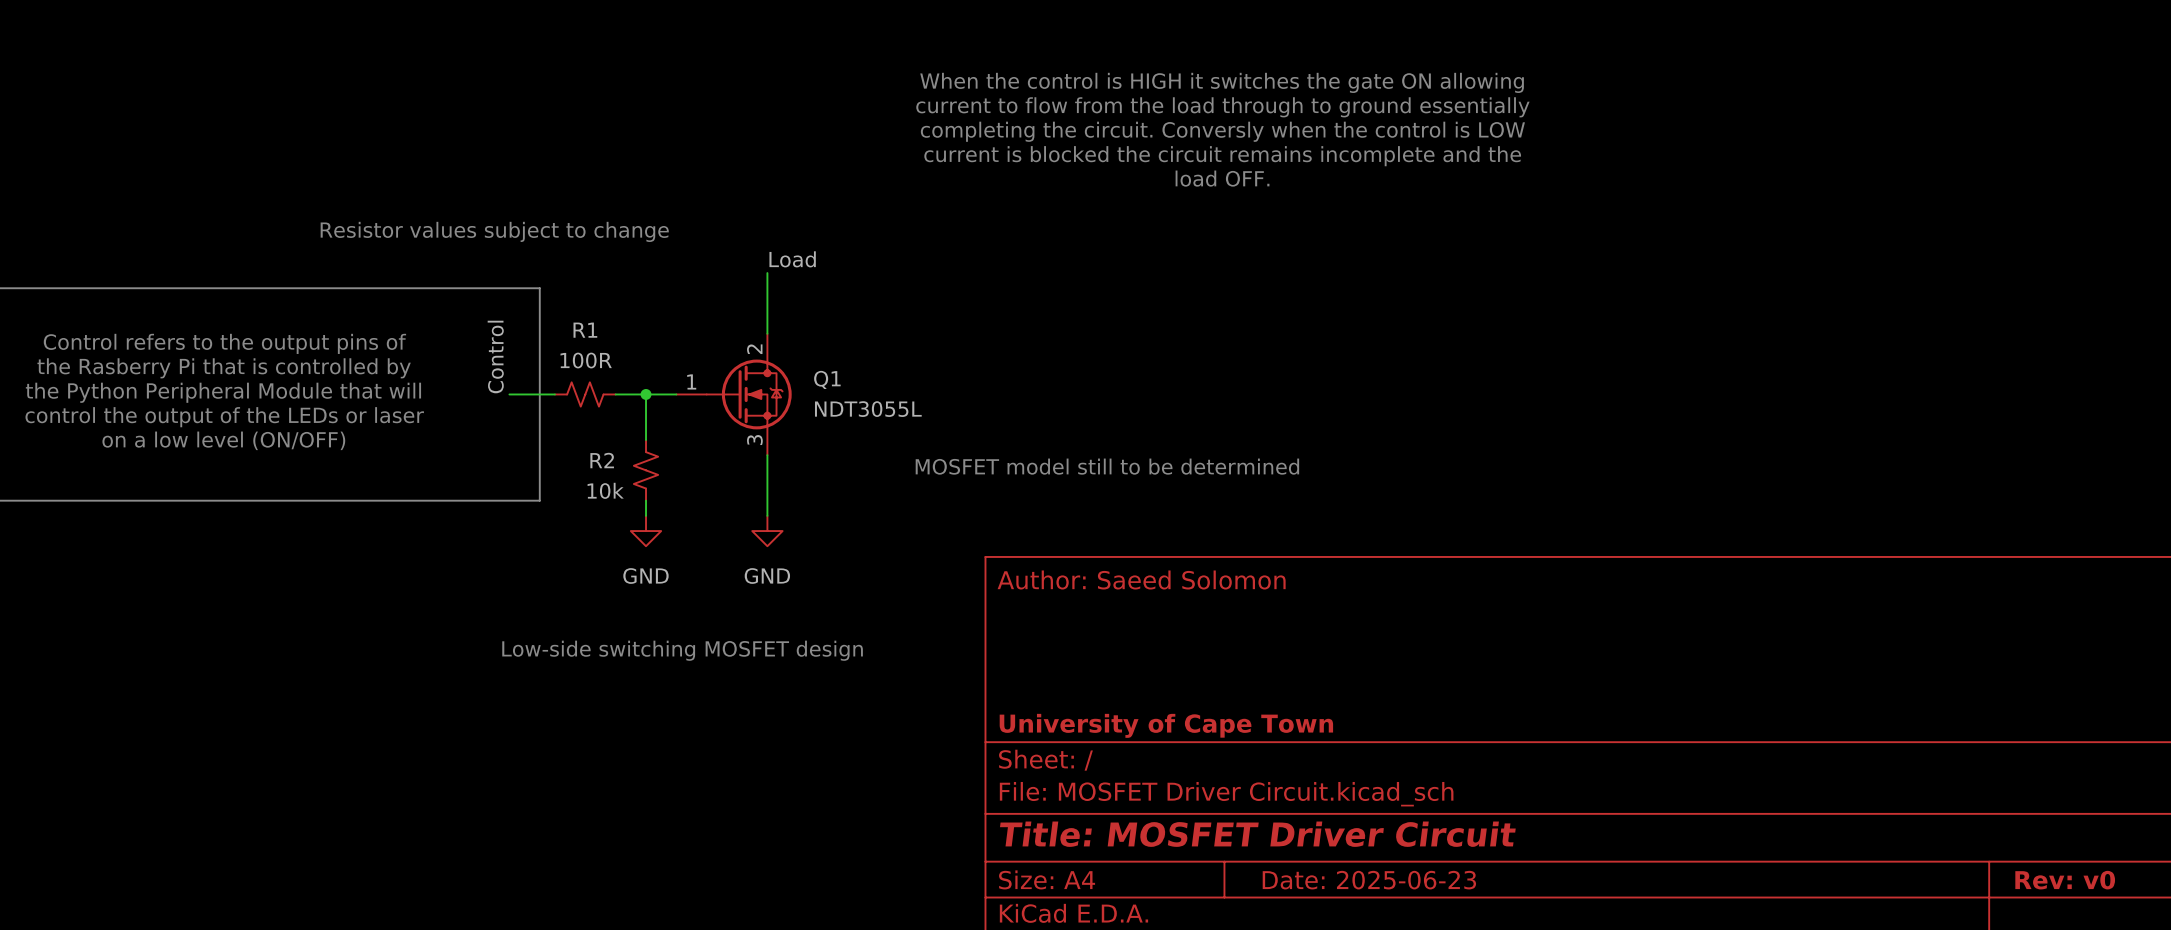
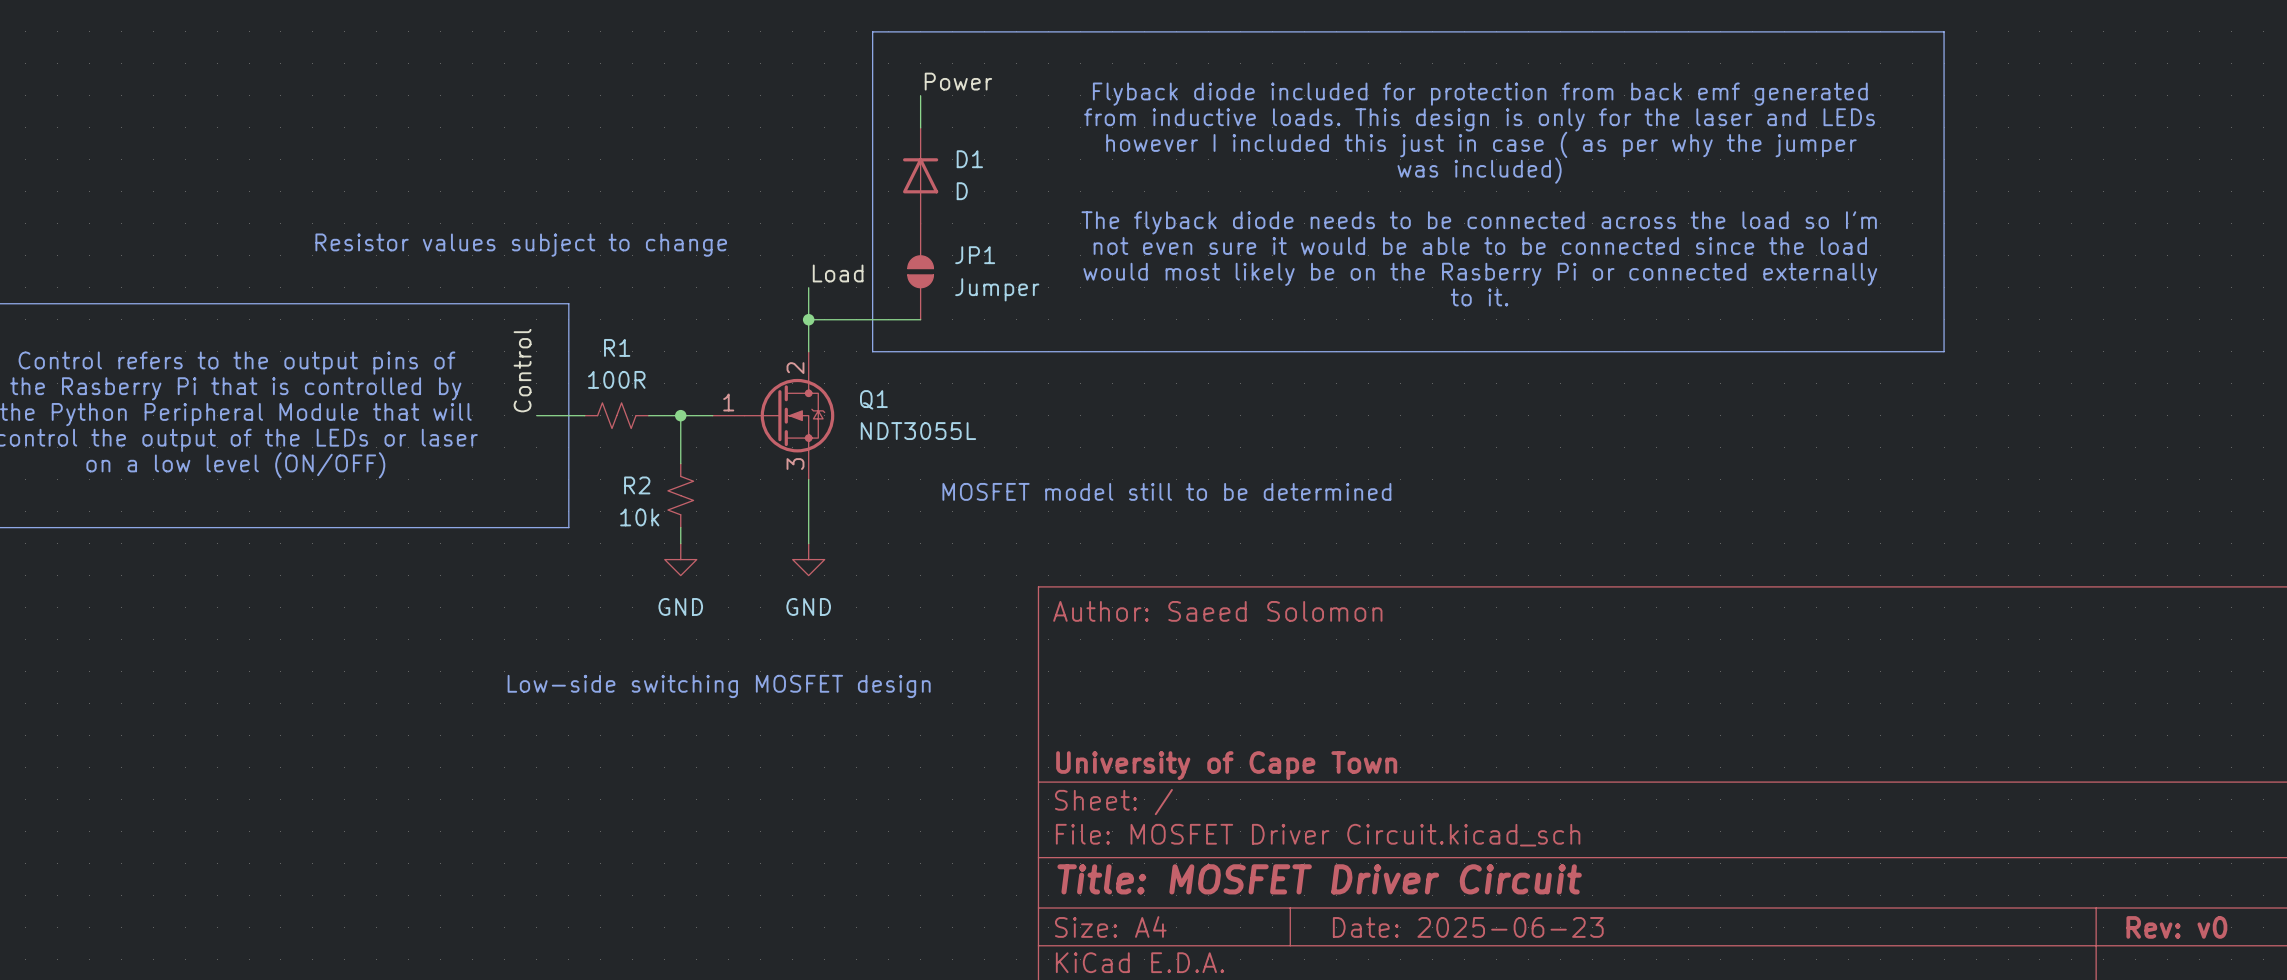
line: none -> (872, 31) (1944, 31) (1944, 351) (872, 351) (872, 31)
label: none -> Power (958, 81)
text: When the control is HIGH it switches the gate ON allowing (1222, 82) -> none
text: none -> Flyback diode included for protection from back emf generated (1480, 94)
wire: none -> (920, 95) (920, 127)
text: current to flow from the load through to ground essentially (1222, 107) -> none
text: none -> from inductive loads. This design is only for the laser and LEDs (1479, 119)
text: completing the circuit. Conversly when the control is LOW (1222, 131) -> none
text: none -> however I included this just in case ( as per why the jumper (1481, 144)
text: current is blocked the circuit remains incomplete and the (1222, 156) -> none
text: none -> was included) (1479, 170)
D1: none -> D (920, 175)
text: load OFF. (1222, 178) -> none
text: none -> The flyback diode needs to be connected across the load so I'm (1479, 222)
text: none -> not even sure it would be able to be connected since the load (1480, 245)
JP1: none -> Jumper (920, 271)
text: none -> would most likely be on the Rasberry Pi or connected externally (1480, 274)
text: none -> to it. (1479, 297)
wire: none -> (808, 319) (920, 319)
junction: none -> (808, 319)

